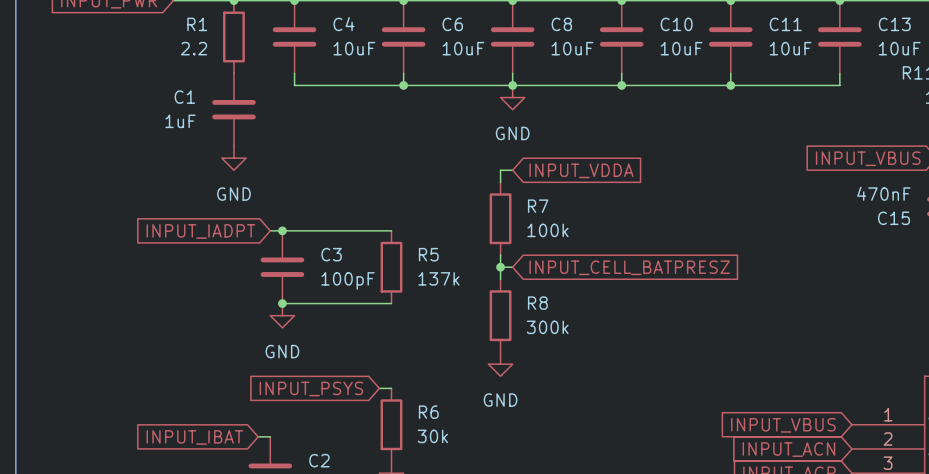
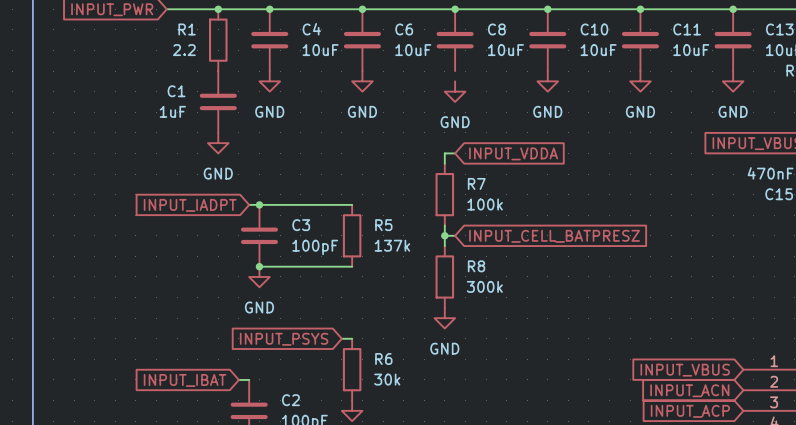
wire: (294, 73) (294, 85) (839, 85) (839, 73) -> none
wire: (512, 73) (512, 85) -> none
power symbol: none -> GND (269, 81)
junction: (403, 85) -> none
power symbol: none -> GND (362, 81)
junction: (512, 85) -> none
junction: (621, 85) -> none
power symbol: none -> GND (547, 81)
junction: (730, 85) -> none
power symbol: none -> GND (640, 81)
power symbol: none -> GND (733, 81)

